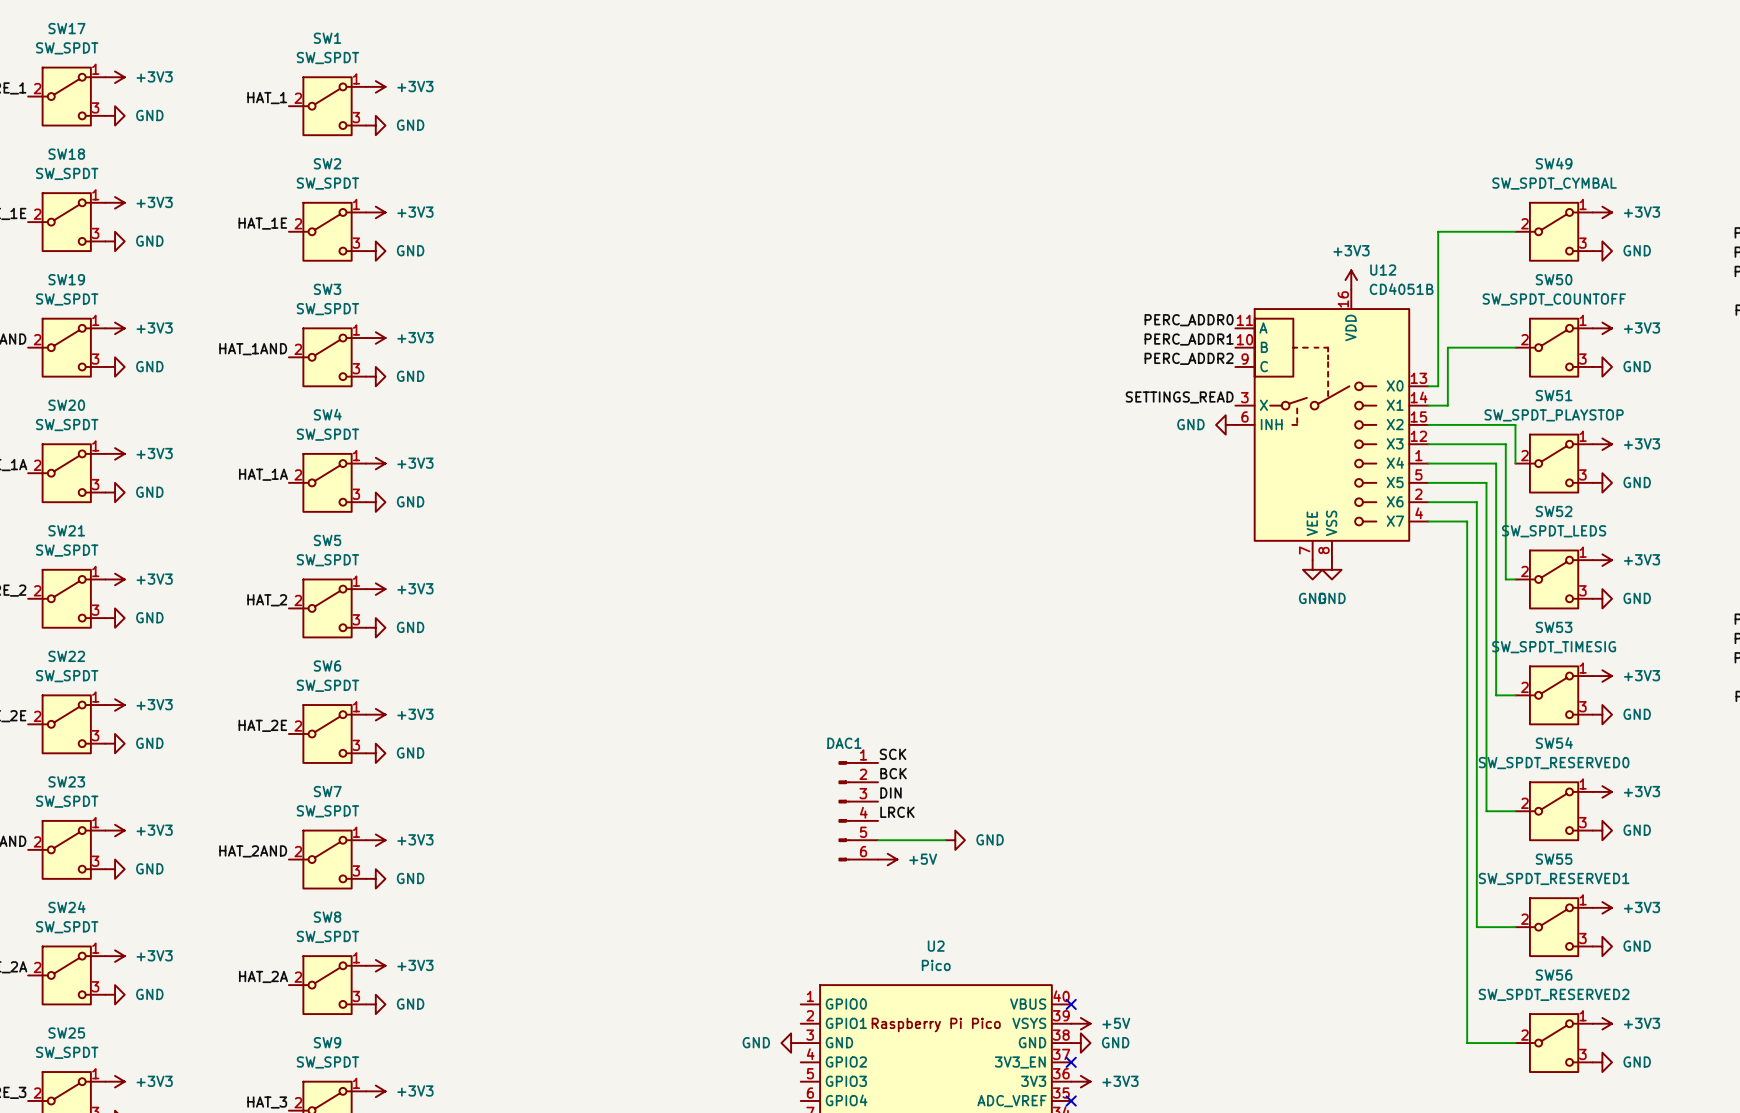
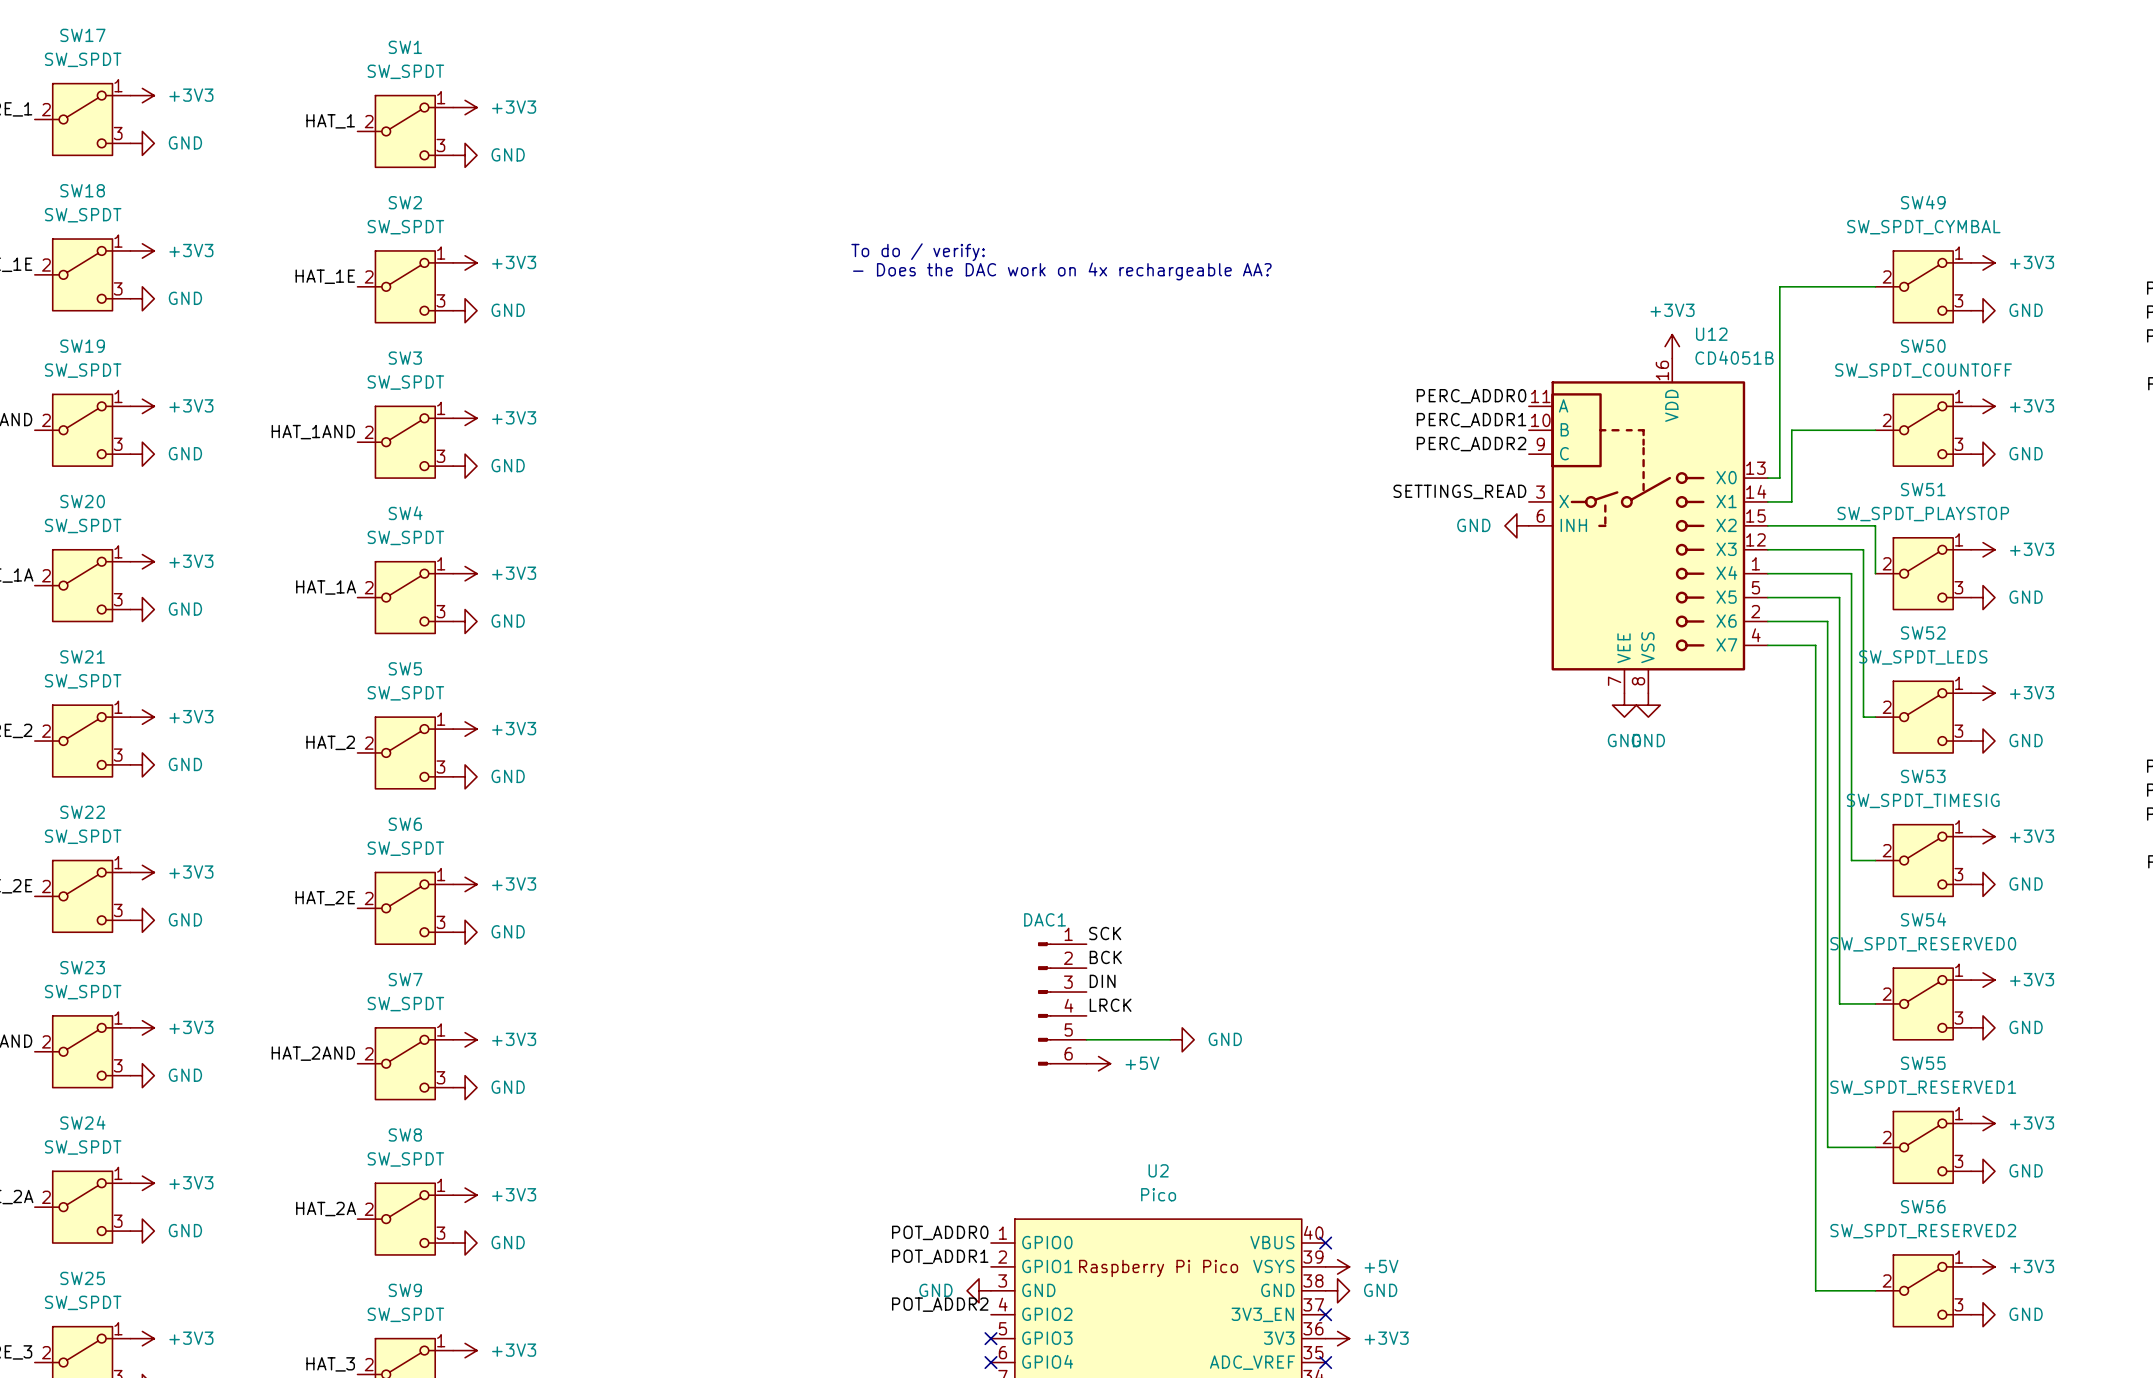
text: none -> To do / verify: (918, 252)
text: none -> - Does the DAC work on 4x rechargeable AA? (1062, 271)
label: none -> POT_ADDR0 (940, 1232)
label: none -> POT_ADDR1 (940, 1256)
label: none -> POT_ADDR2 (940, 1304)
no-connect mark: none -> (990, 1338)
no-connect mark: none -> (990, 1362)

